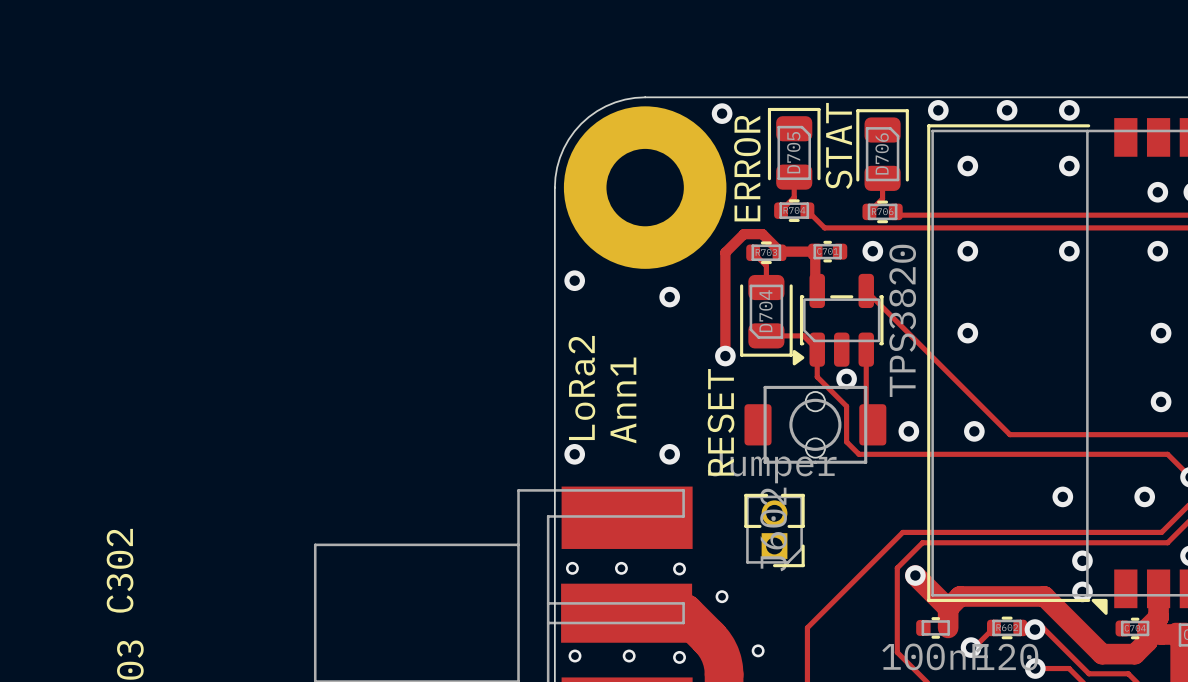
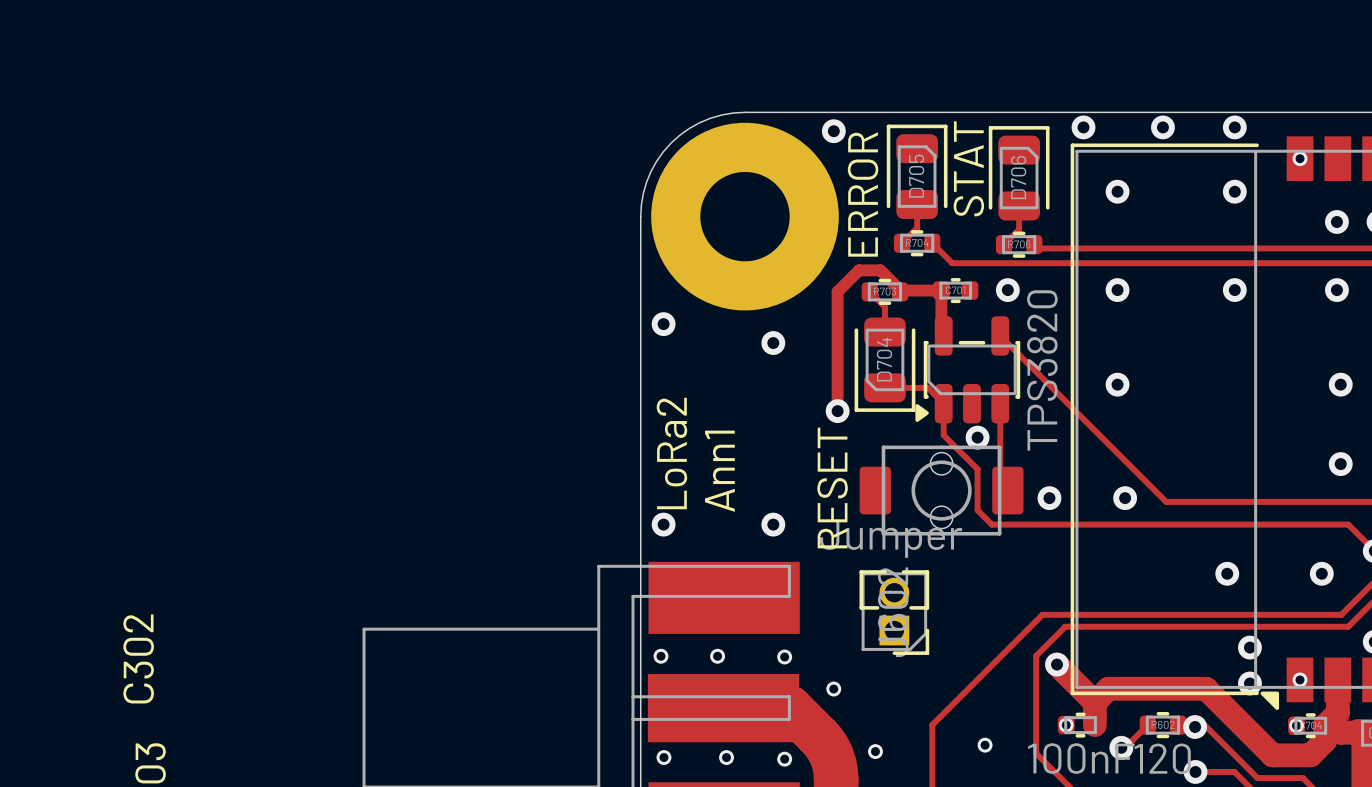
via: none -> (1300, 158)
via: none -> (1300, 679)
via: none -> (1066, 725)
via: none -> (1296, 725)
via: none -> (985, 745)

